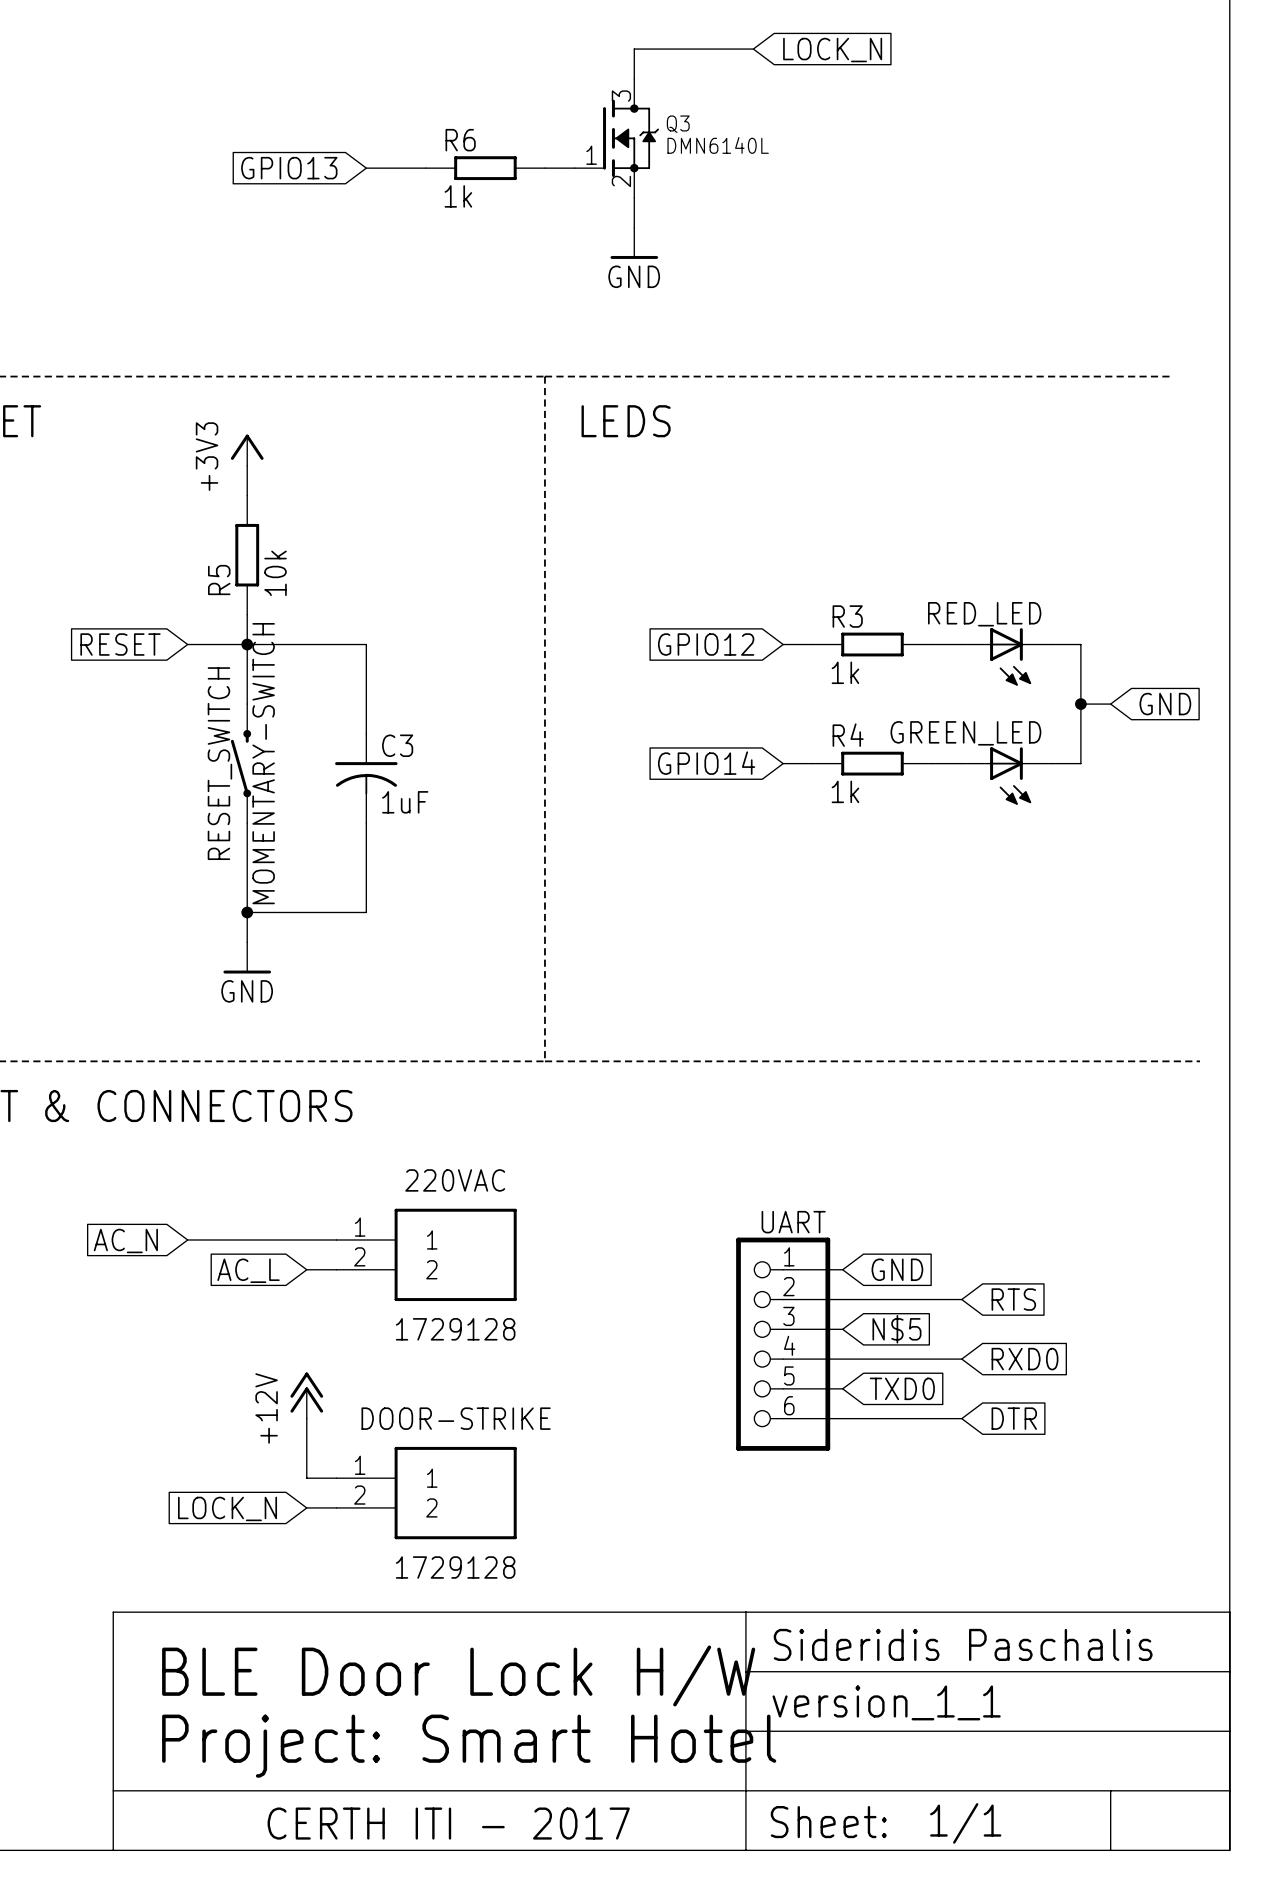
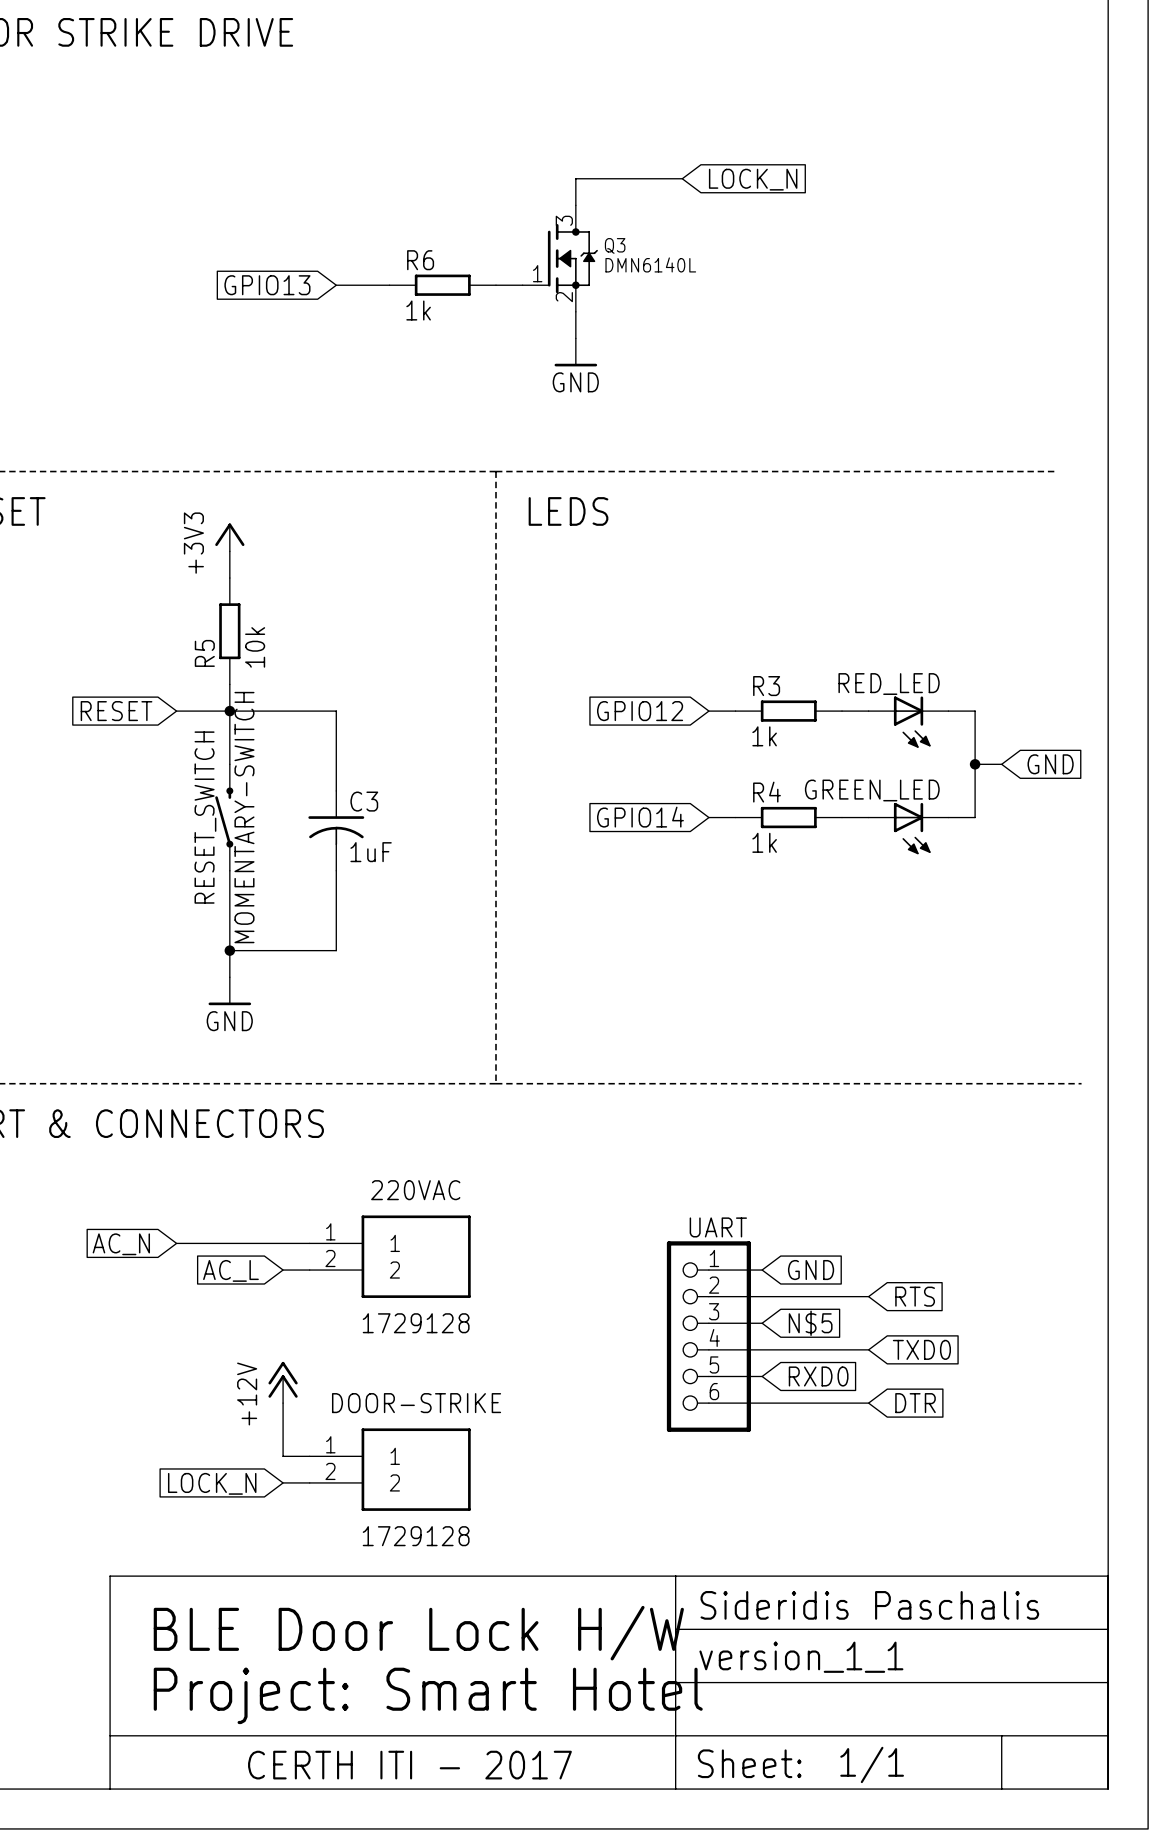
global label: RXD0 (1024, 1359) -> TXD0 (921, 1349)
global label: TXD0 (902, 1388) -> RXD0 (818, 1376)

